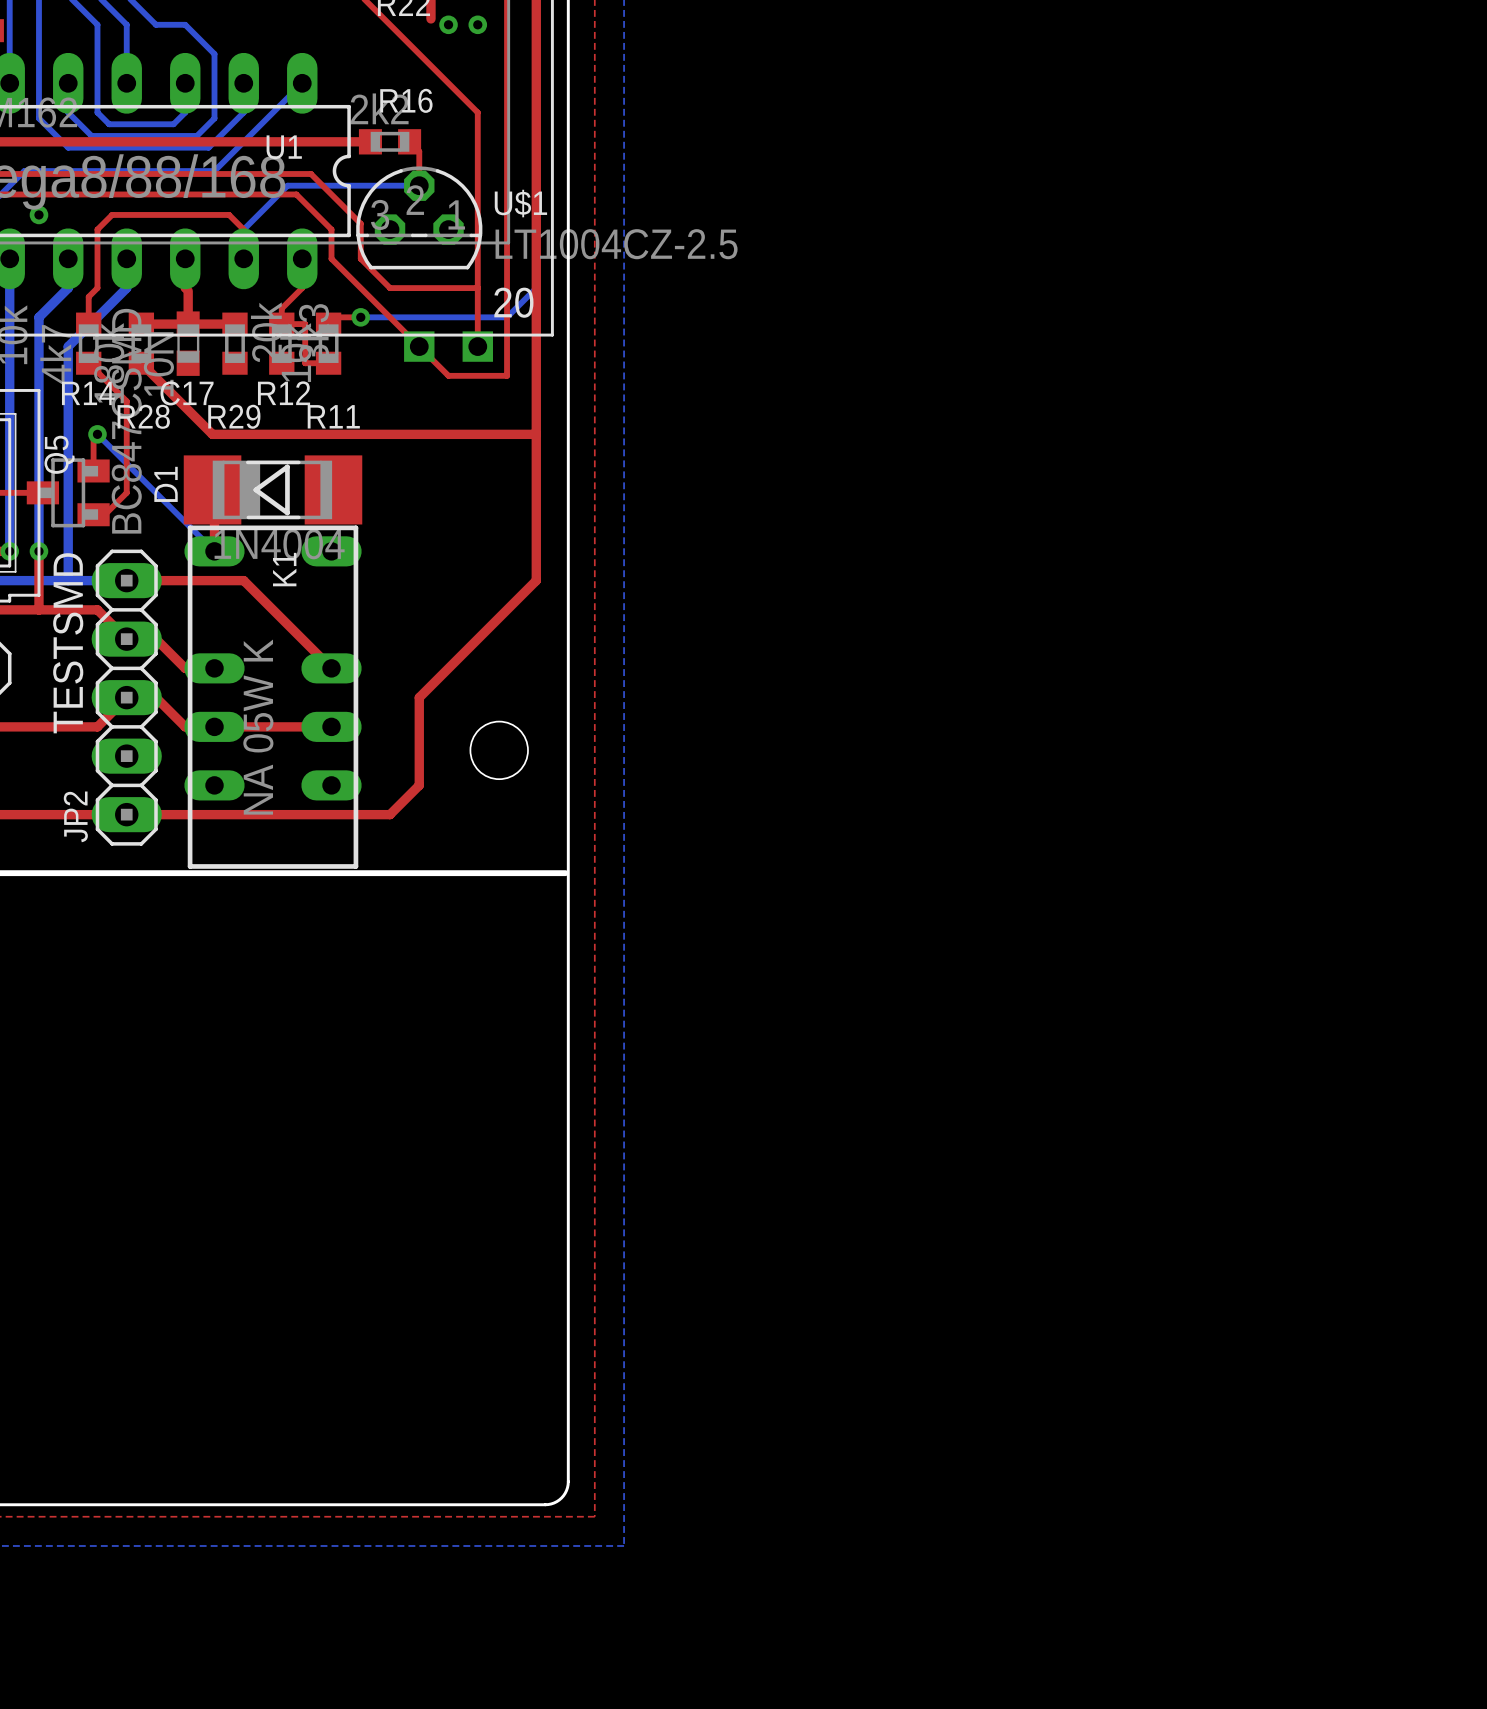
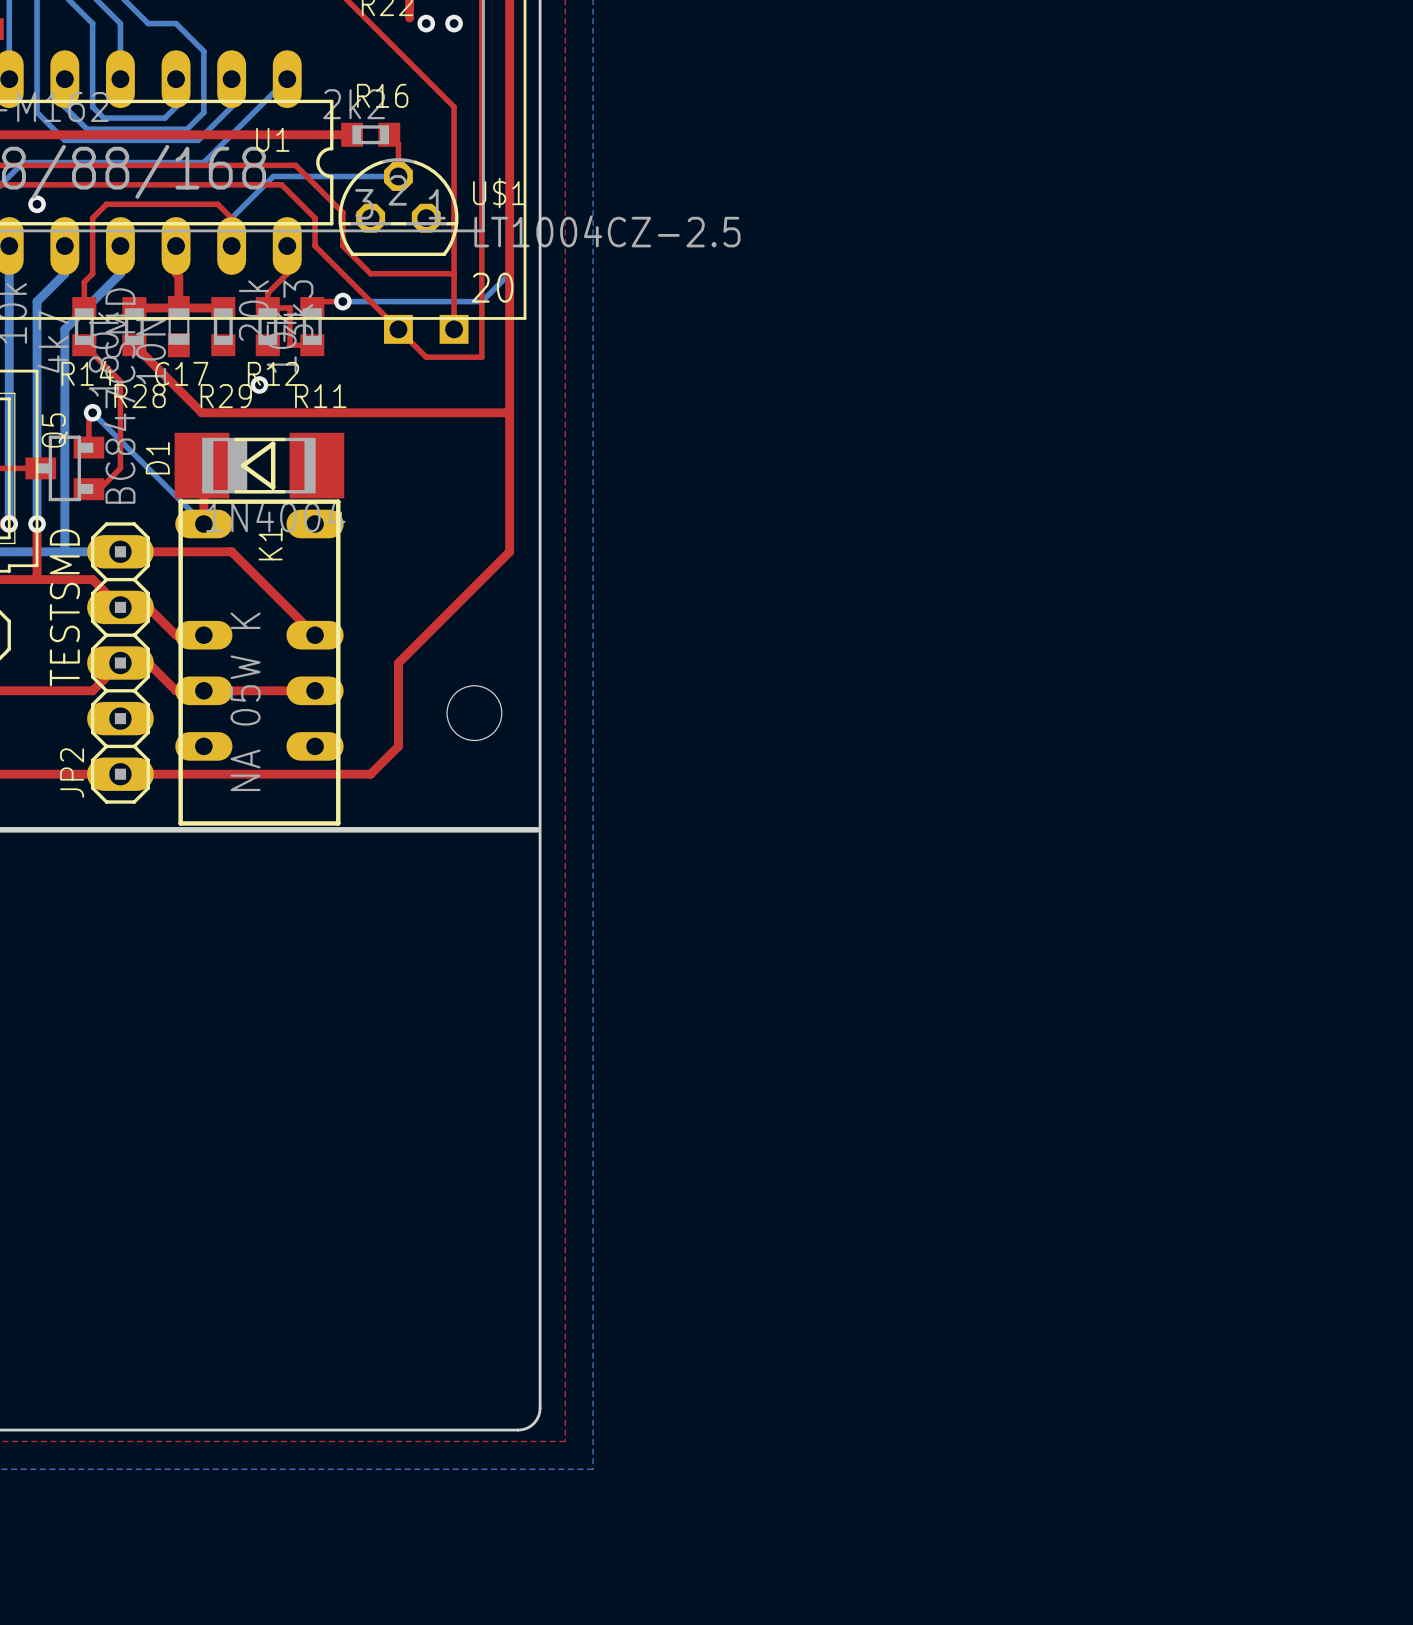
via: none -> (259, 384)

